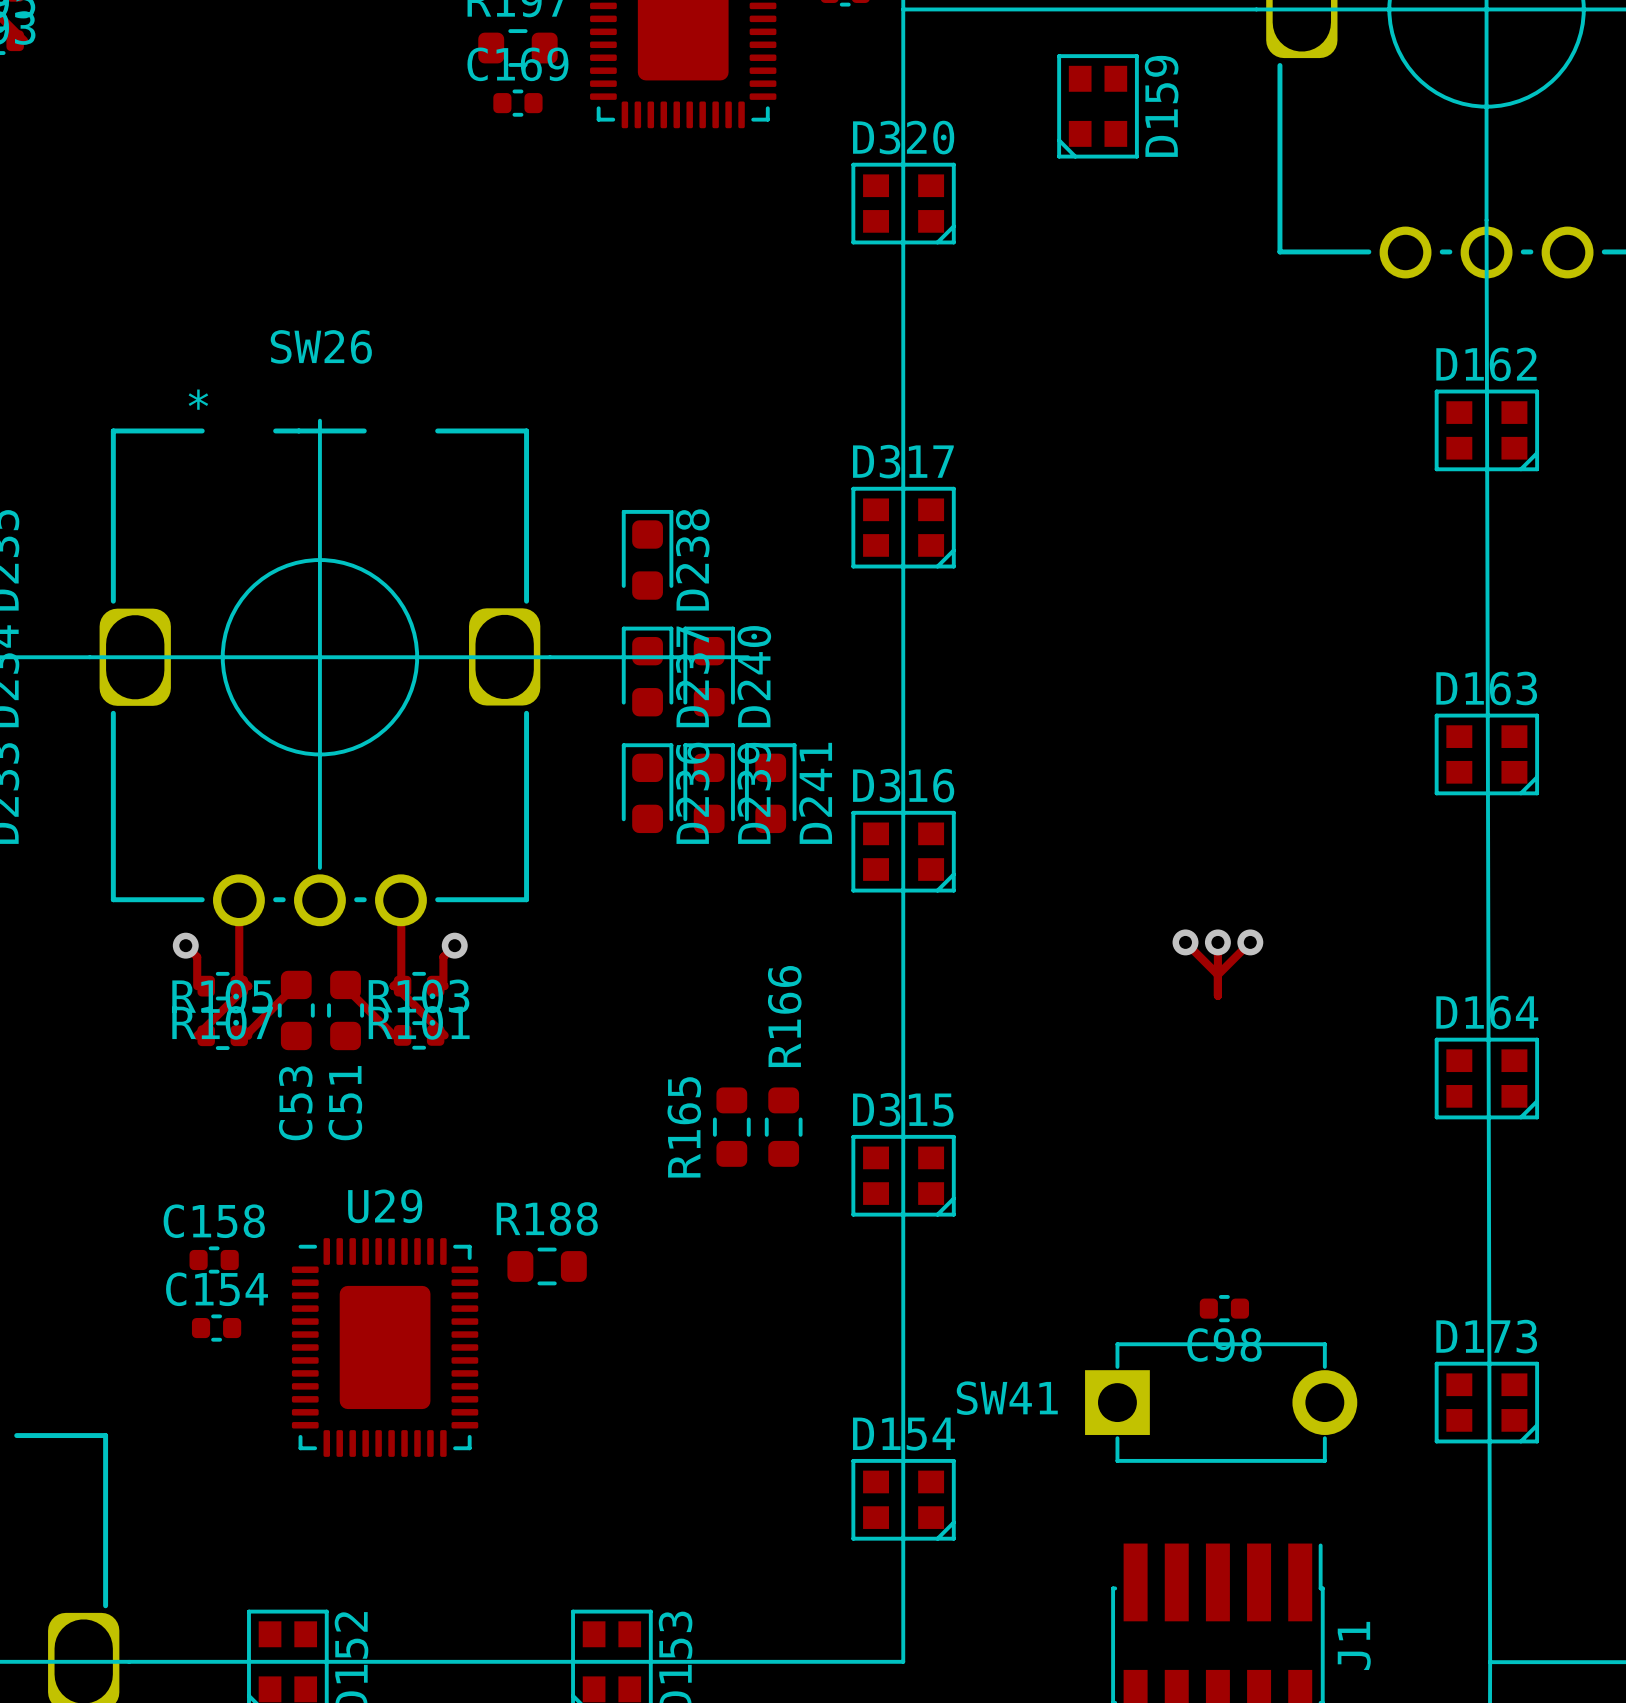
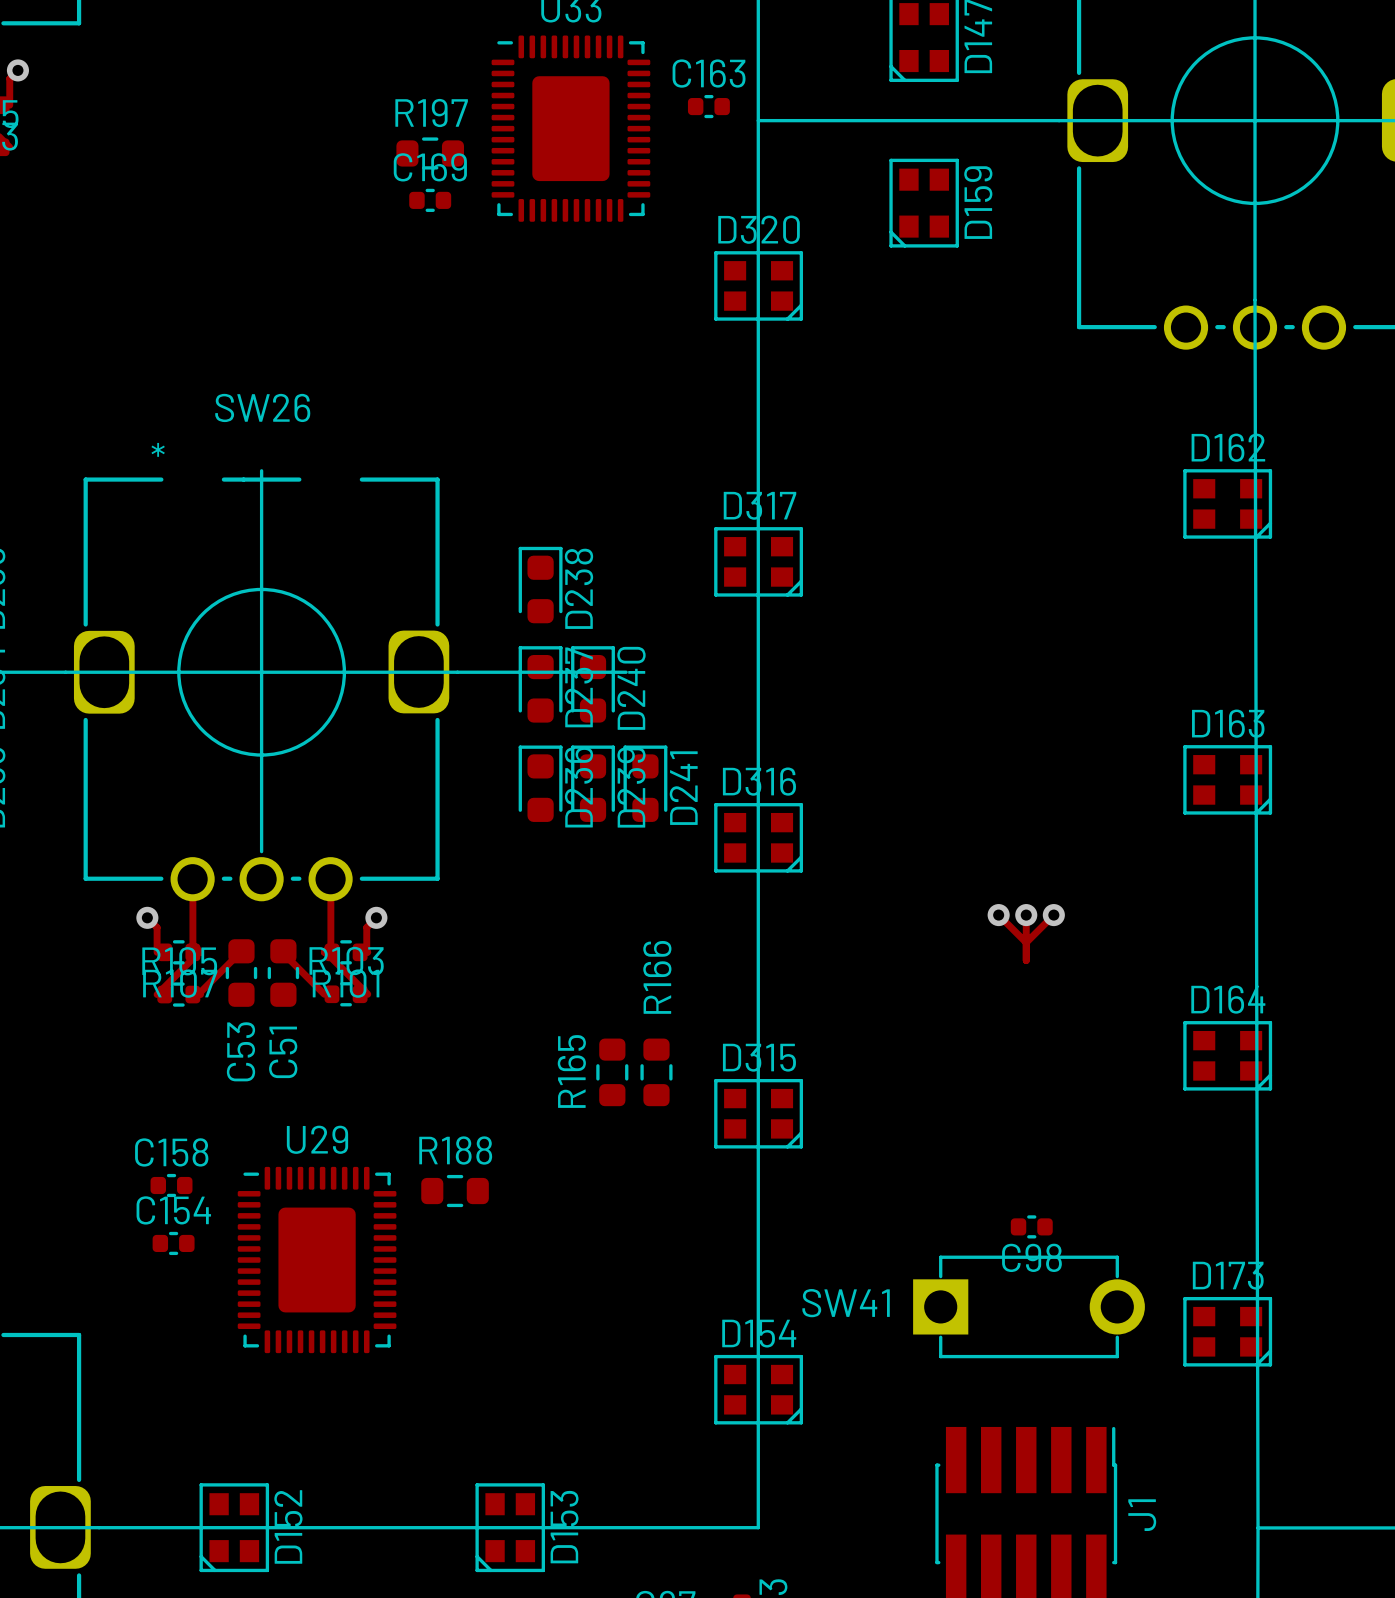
D162 position: (1486, 430) -> (1227, 503)
D163 position: (1486, 754) -> (1227, 779)
D164 position: (1486, 1078) -> (1227, 1055)
D173 position: (1486, 1402) -> (1227, 1331)

